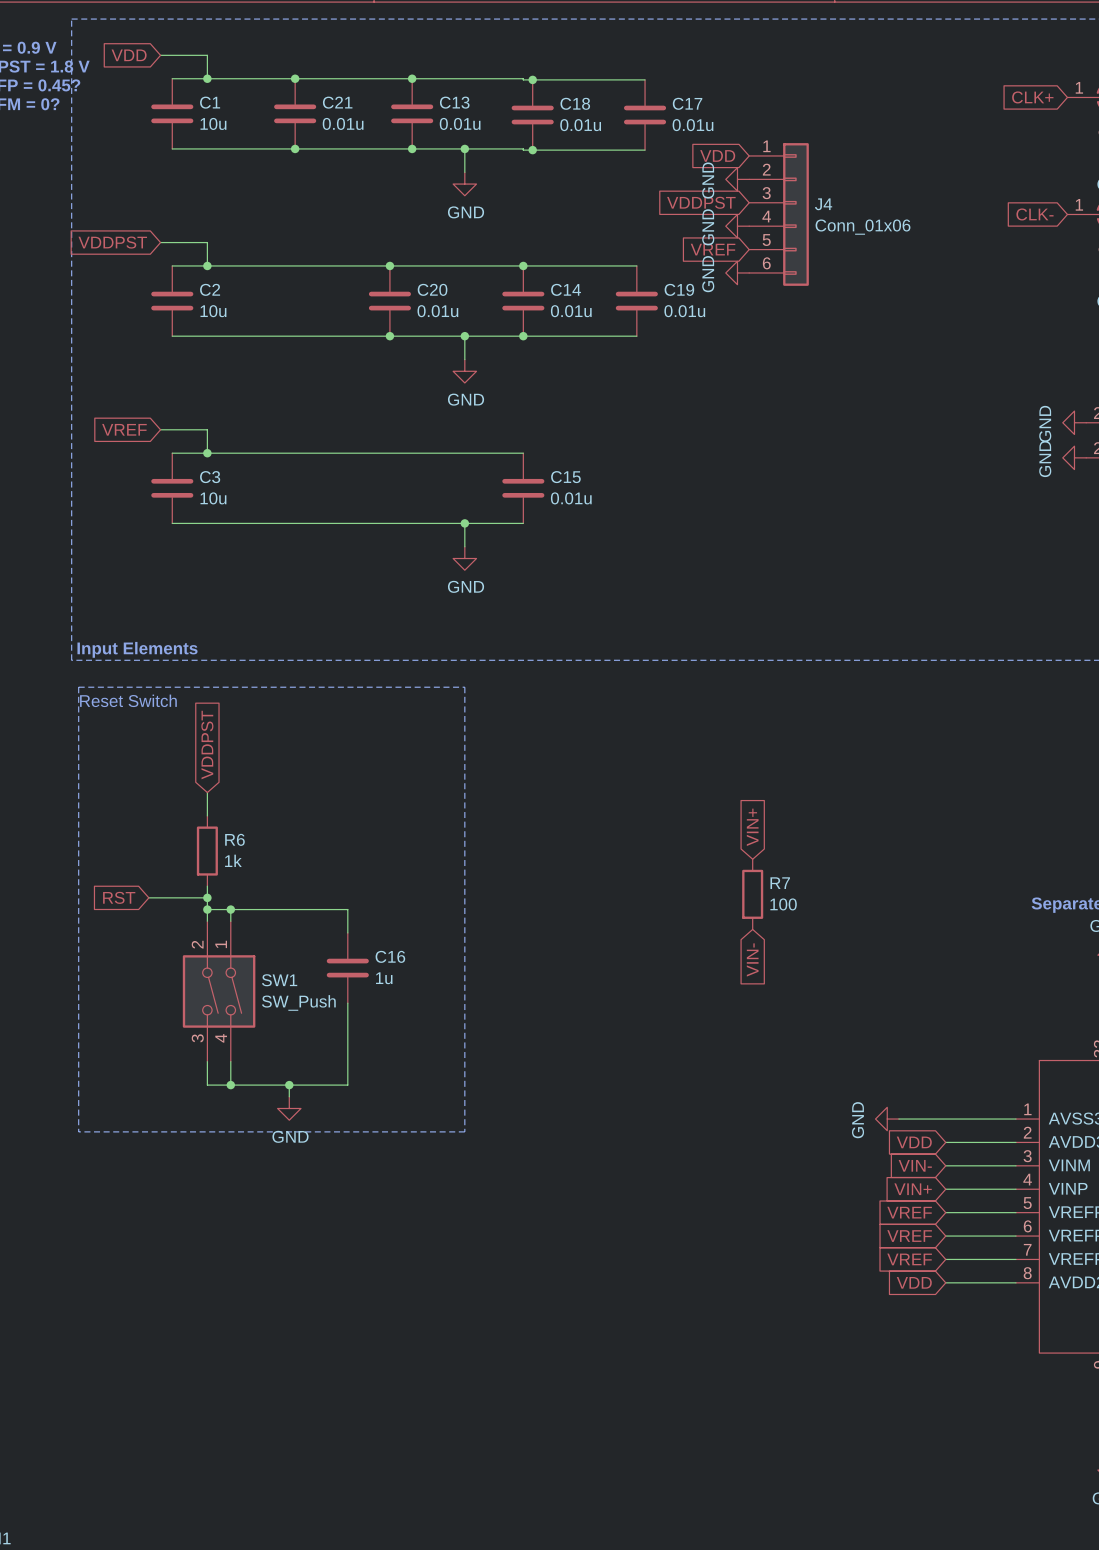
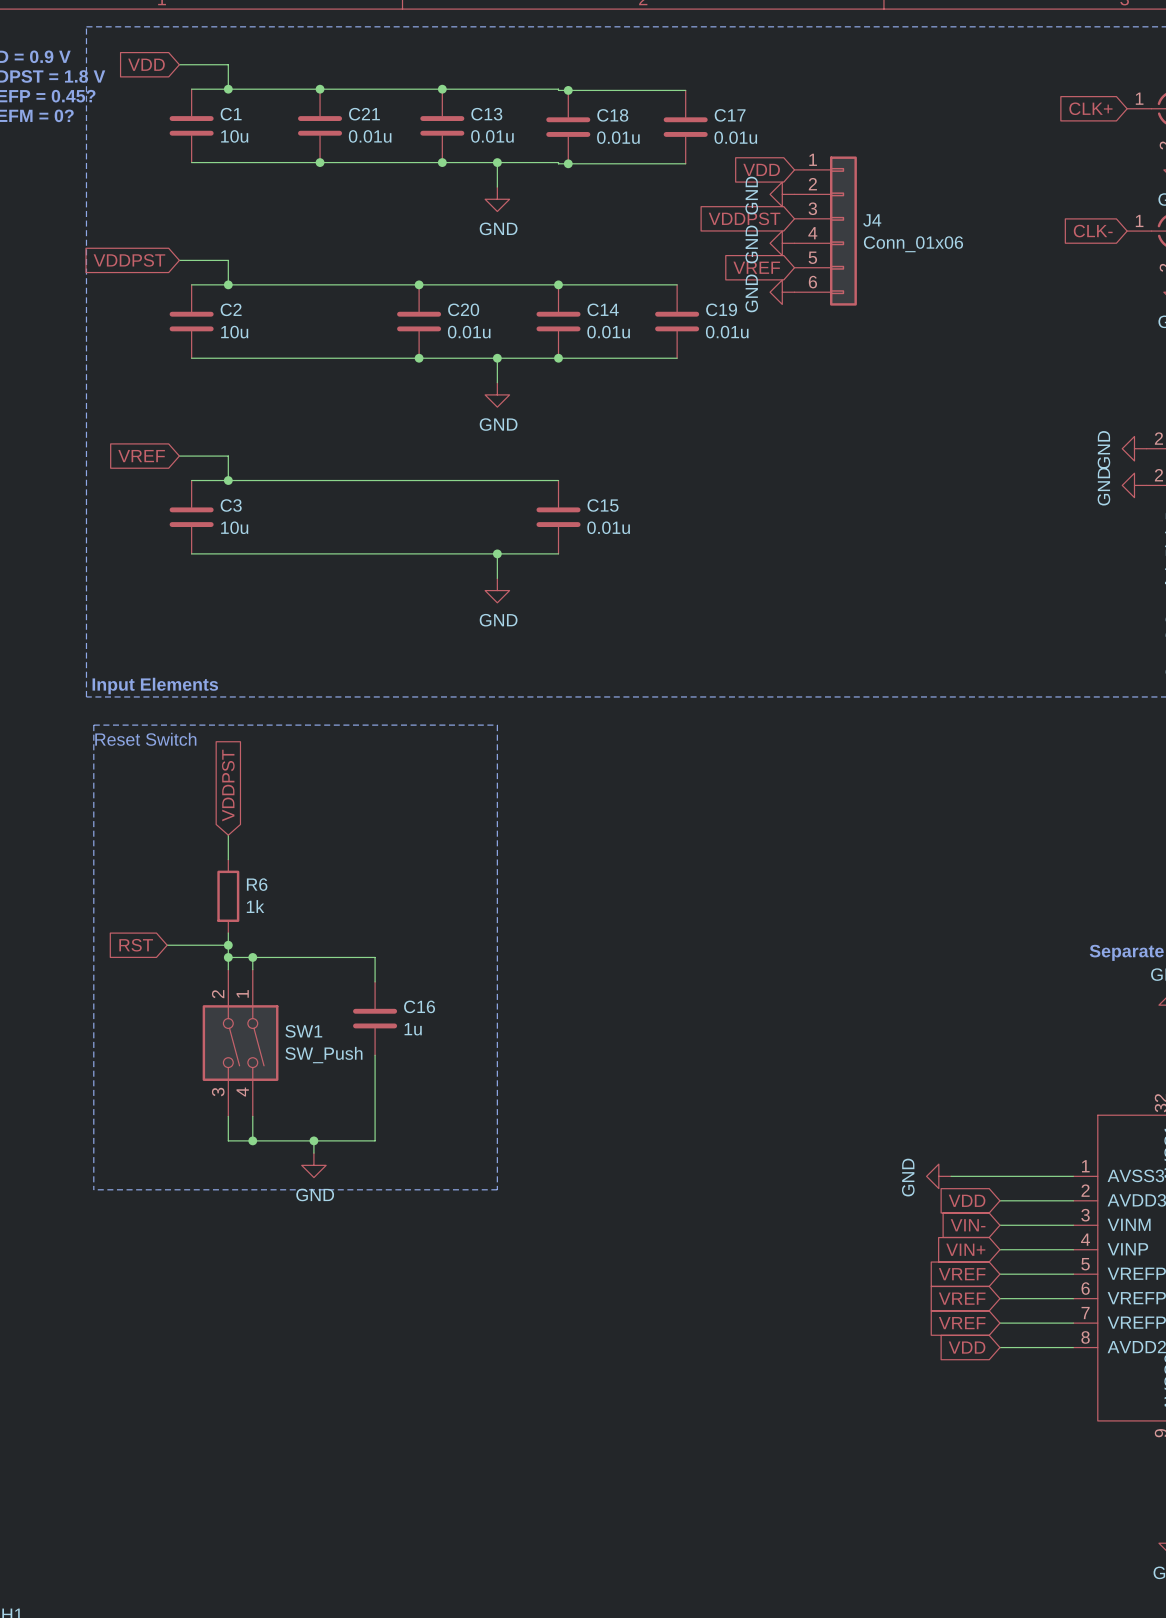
global label: VIN+ (752, 827) -> none
R7: 100 (752, 894) -> none
global label: VIN- (752, 959) -> none

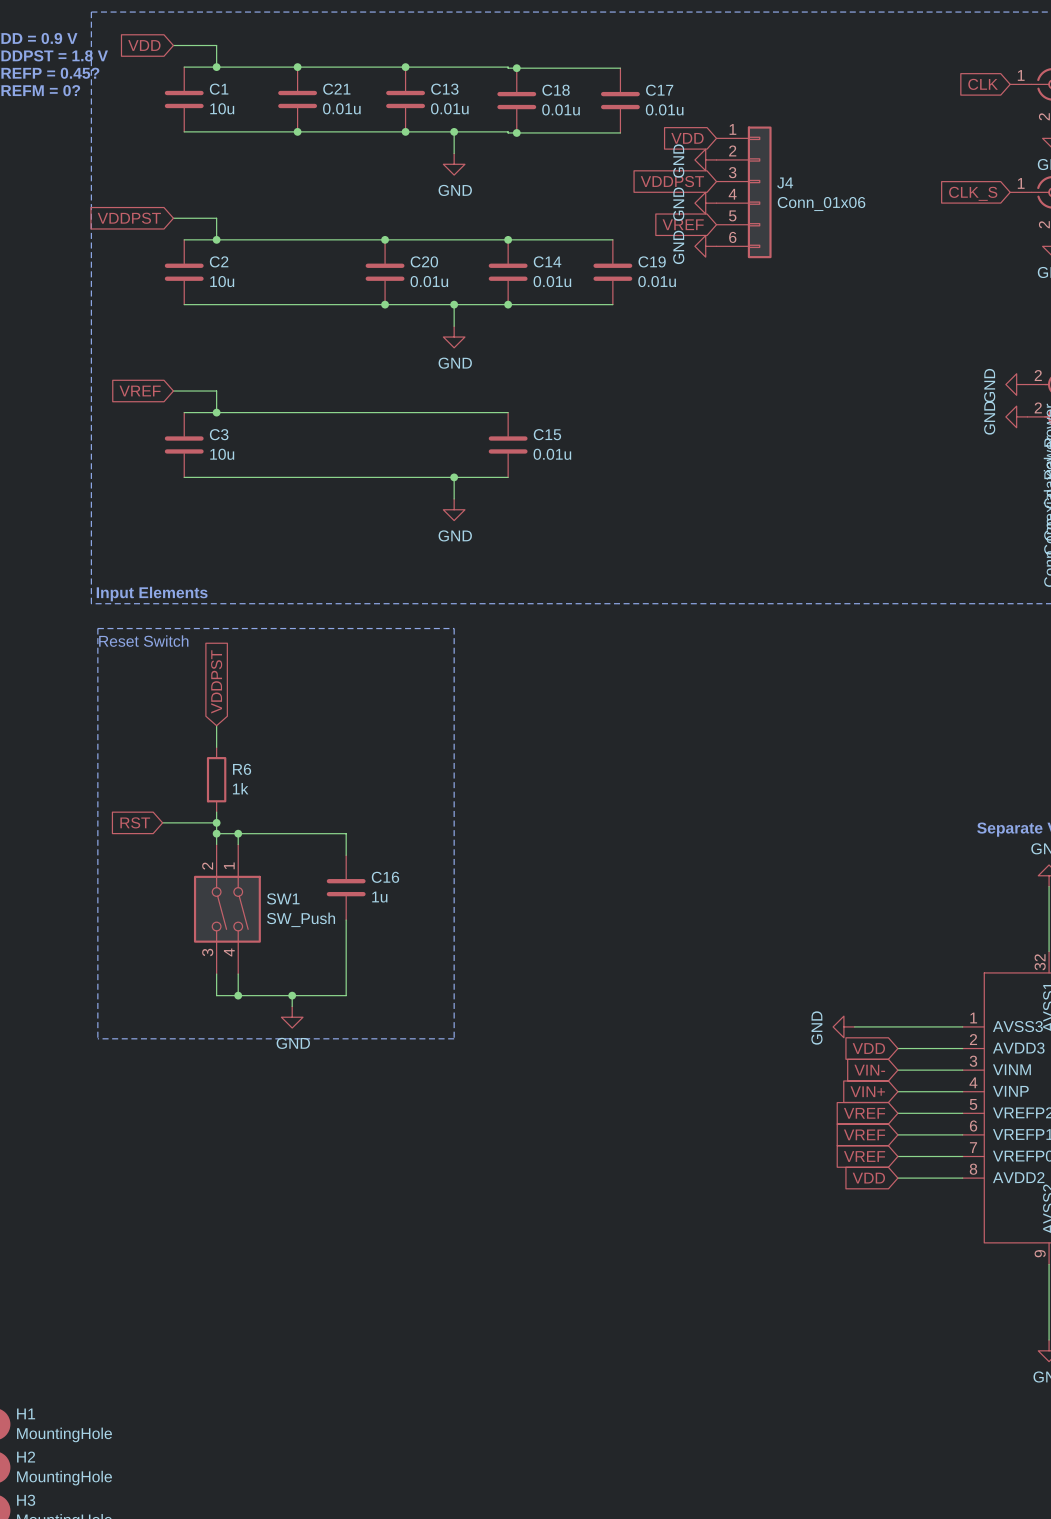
global label: CLK+ (1090, 108) -> CLK (983, 84)
global label: CLK- (1093, 231) -> CLK_S (973, 193)

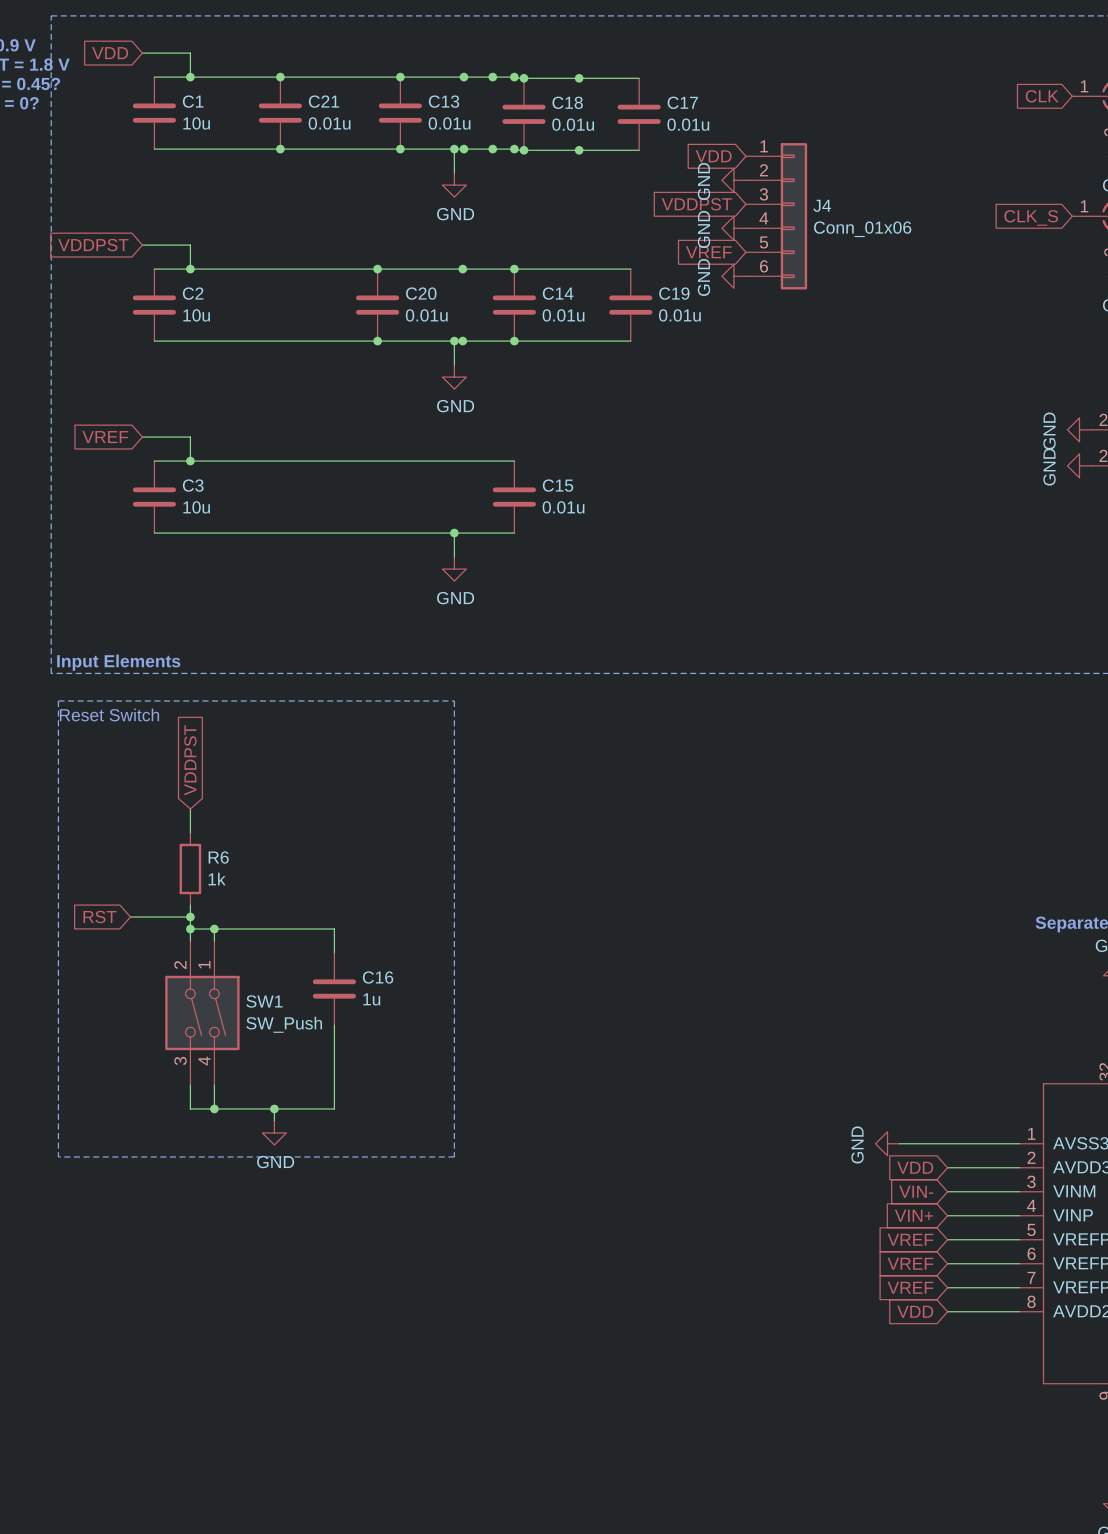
junction: none -> (463, 77)
junction: none -> (492, 77)
junction: none -> (514, 77)
junction: none -> (579, 78)
junction: none -> (463, 149)
junction: none -> (492, 149)
junction: none -> (514, 149)
junction: none -> (579, 150)
junction: none -> (462, 269)
junction: none -> (462, 341)

